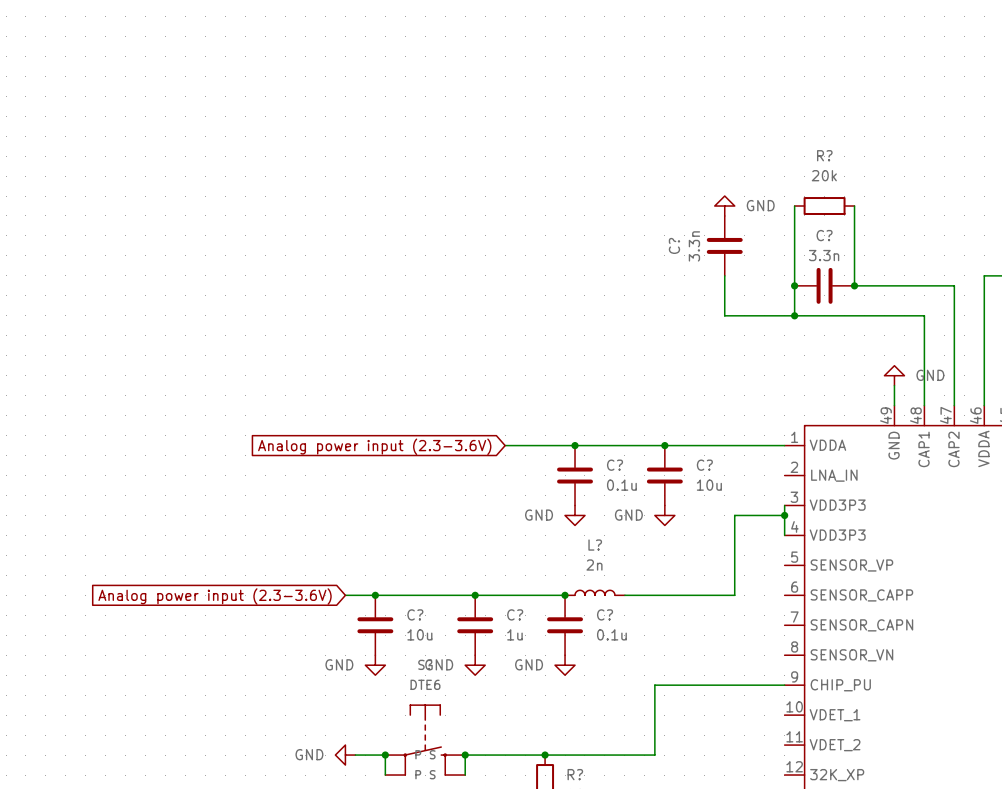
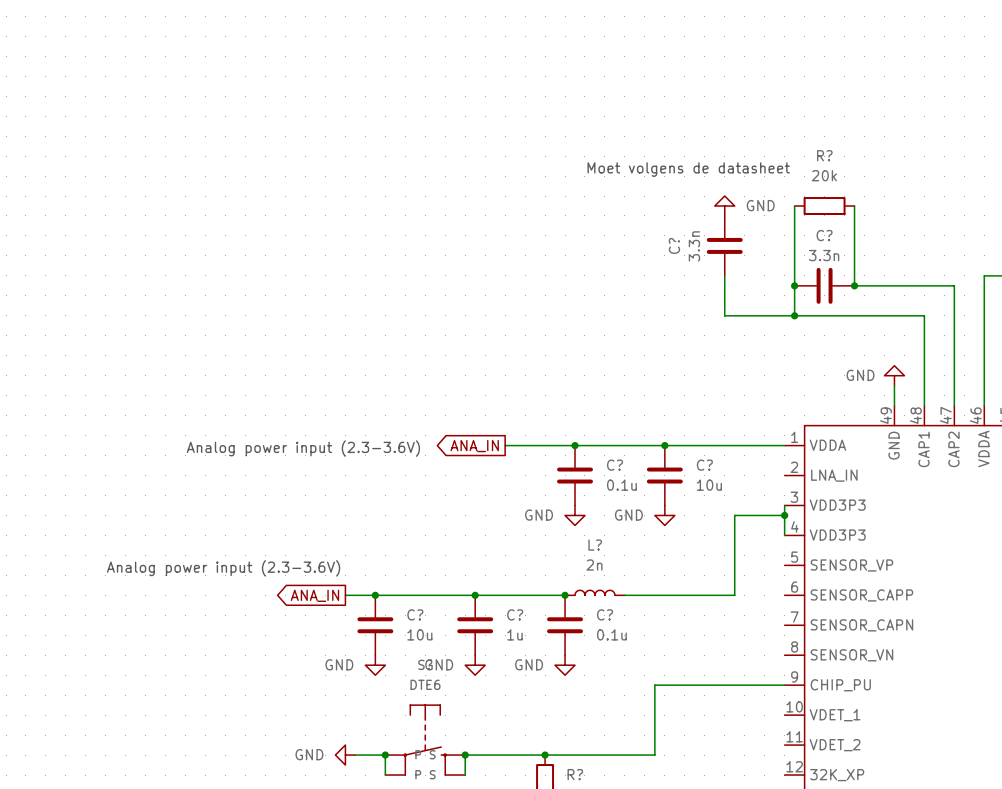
text: none -> Moet volgens de datasheet (688, 169)
power symbol text position: GND (930, 375) -> GND (860, 375)
global label shape: input (374, 446) -> output (474, 446)
global label: Analog power input (2.3-3.6V) (374, 446) -> ANA_IN (474, 446)
text: none -> Analog power input (2.3-3.6V) (303, 448)
text: none -> Analog power input (2.3-3.6V) (223, 568)
global label shape: input (215, 596) -> output (314, 595)
global label: Analog power input (2.3-3.6V) (215, 596) -> ANA_IN (314, 595)

